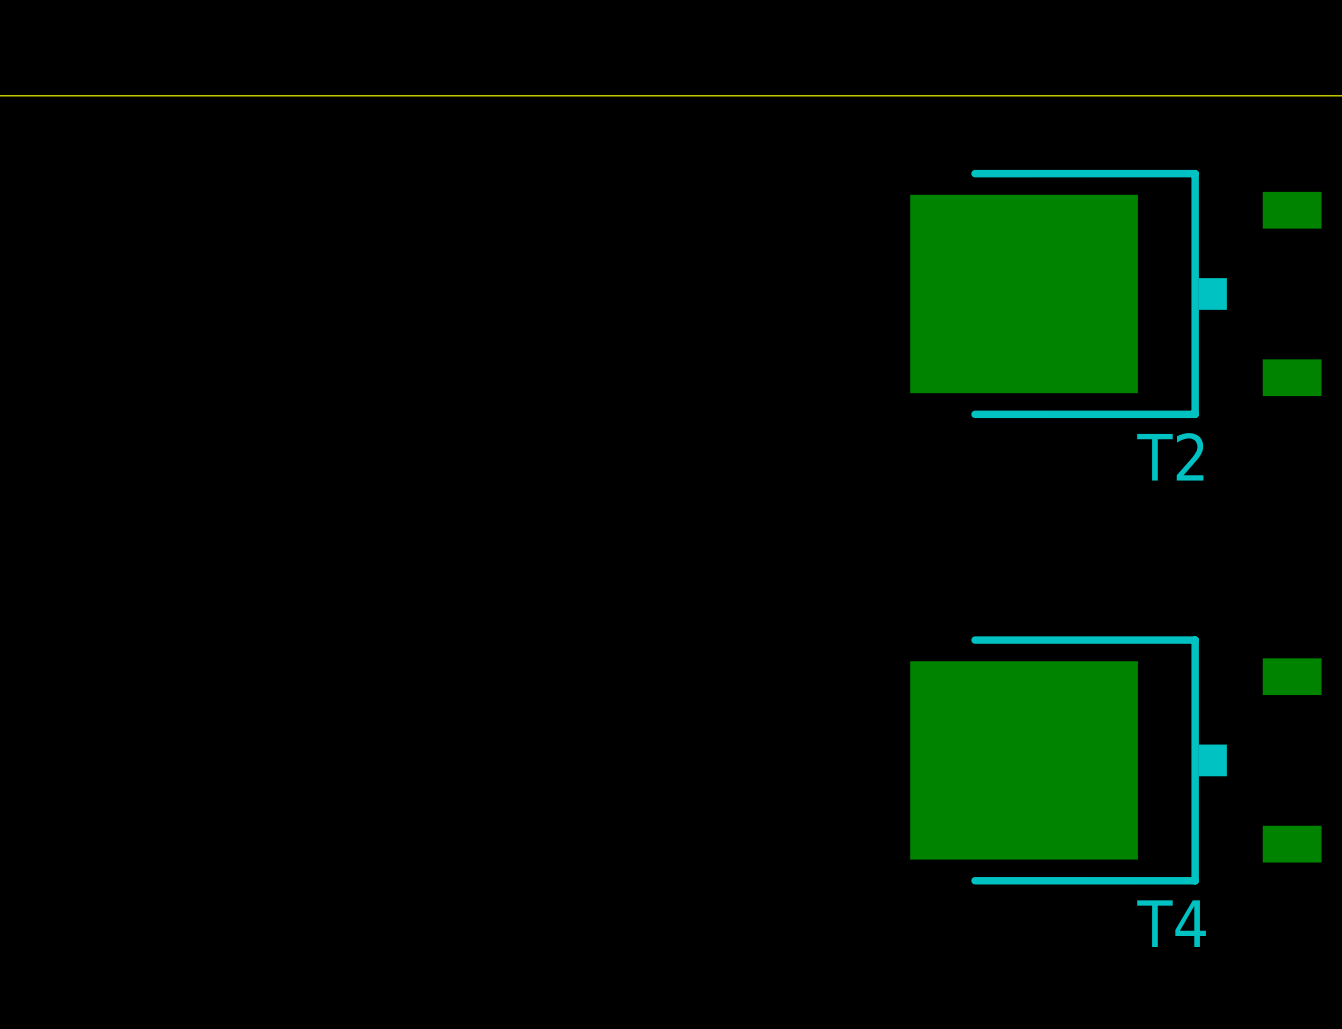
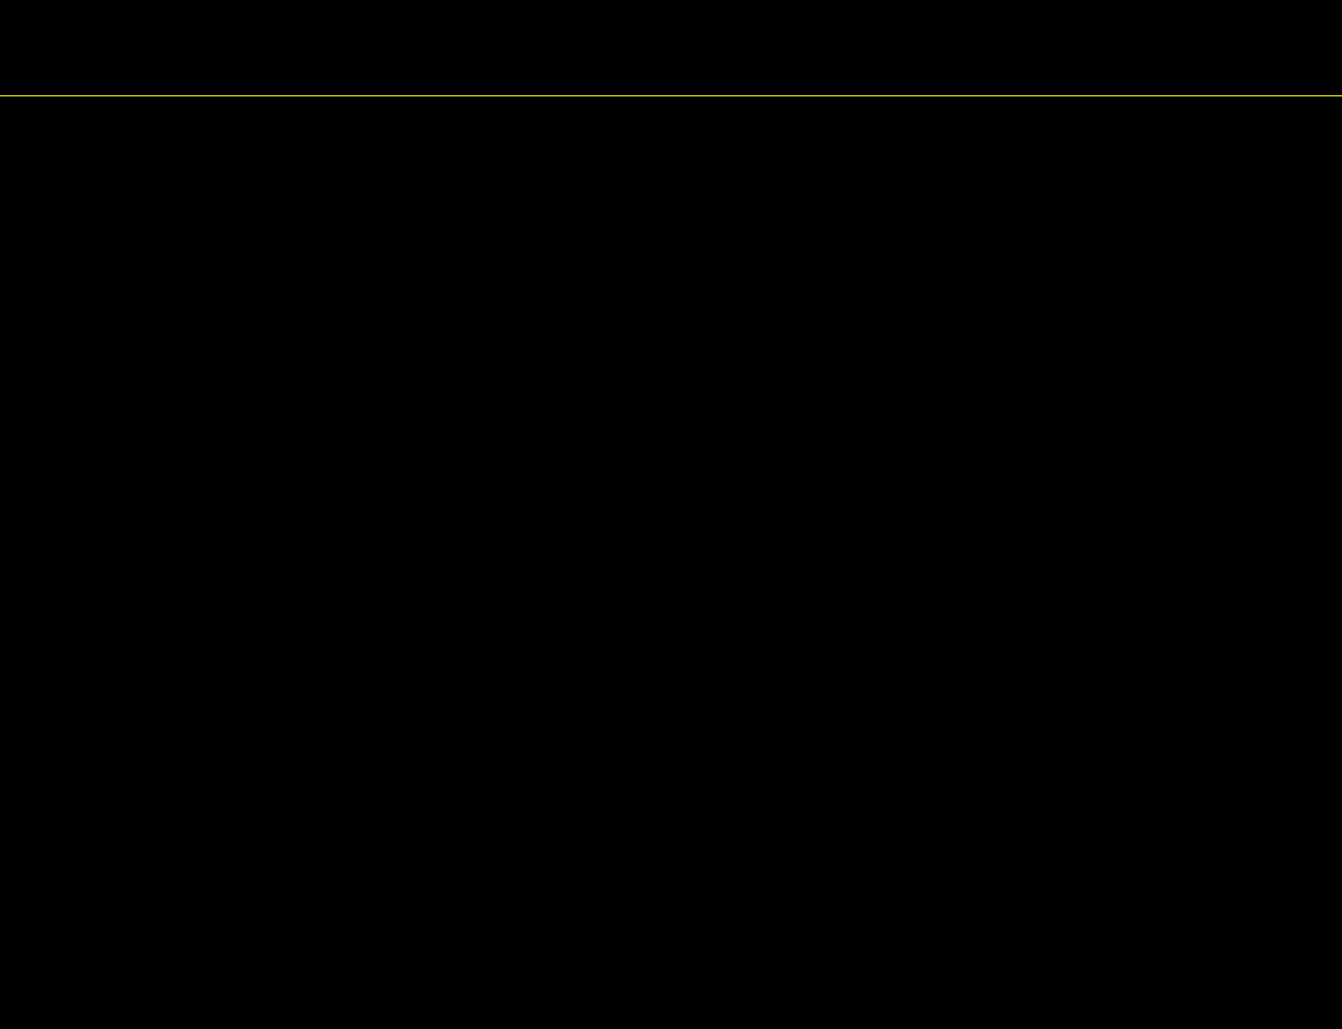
T2: (1115, 293) -> none
T4: (1115, 760) -> none

